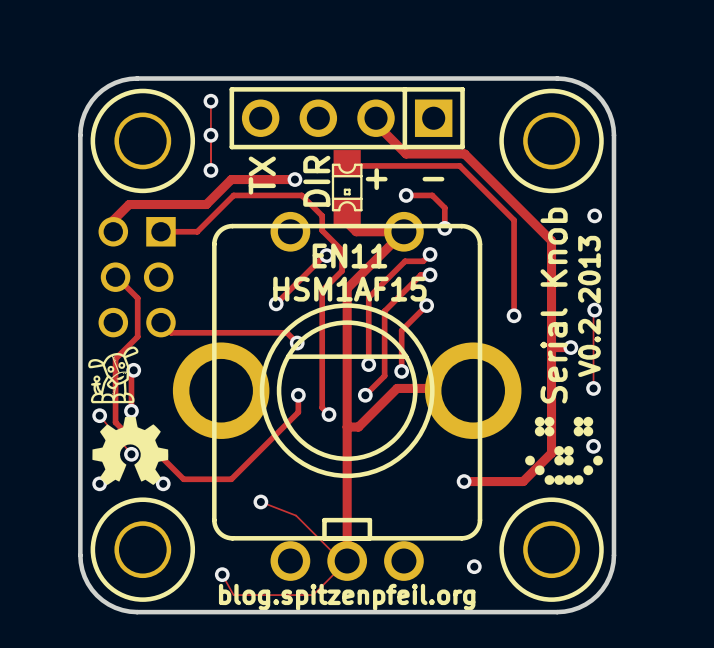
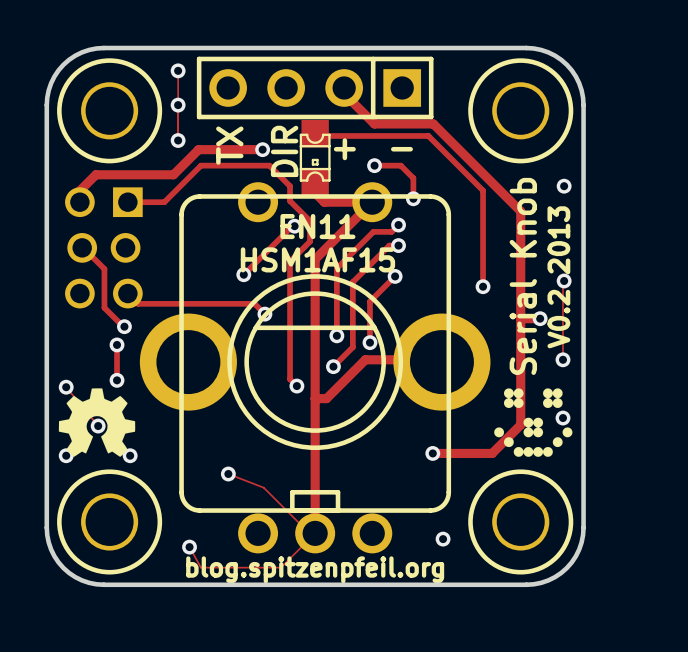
track: (137, 336) (115, 358) (115, 422) (131, 438) (142, 438) (183, 479) (231, 479) (298, 412) (298, 395) -> (104, 307) (124, 326)
drawing: [88, 346, 139, 404] -> none
via: none -> (124, 326)
track: (133, 370) (131, 372) (131, 411) -> none
via: (133, 370) -> none
track: none -> (117, 344) (117, 380)
via: none -> (117, 344)
via: (298, 395) -> none
via position: (131, 411) -> (117, 380)

